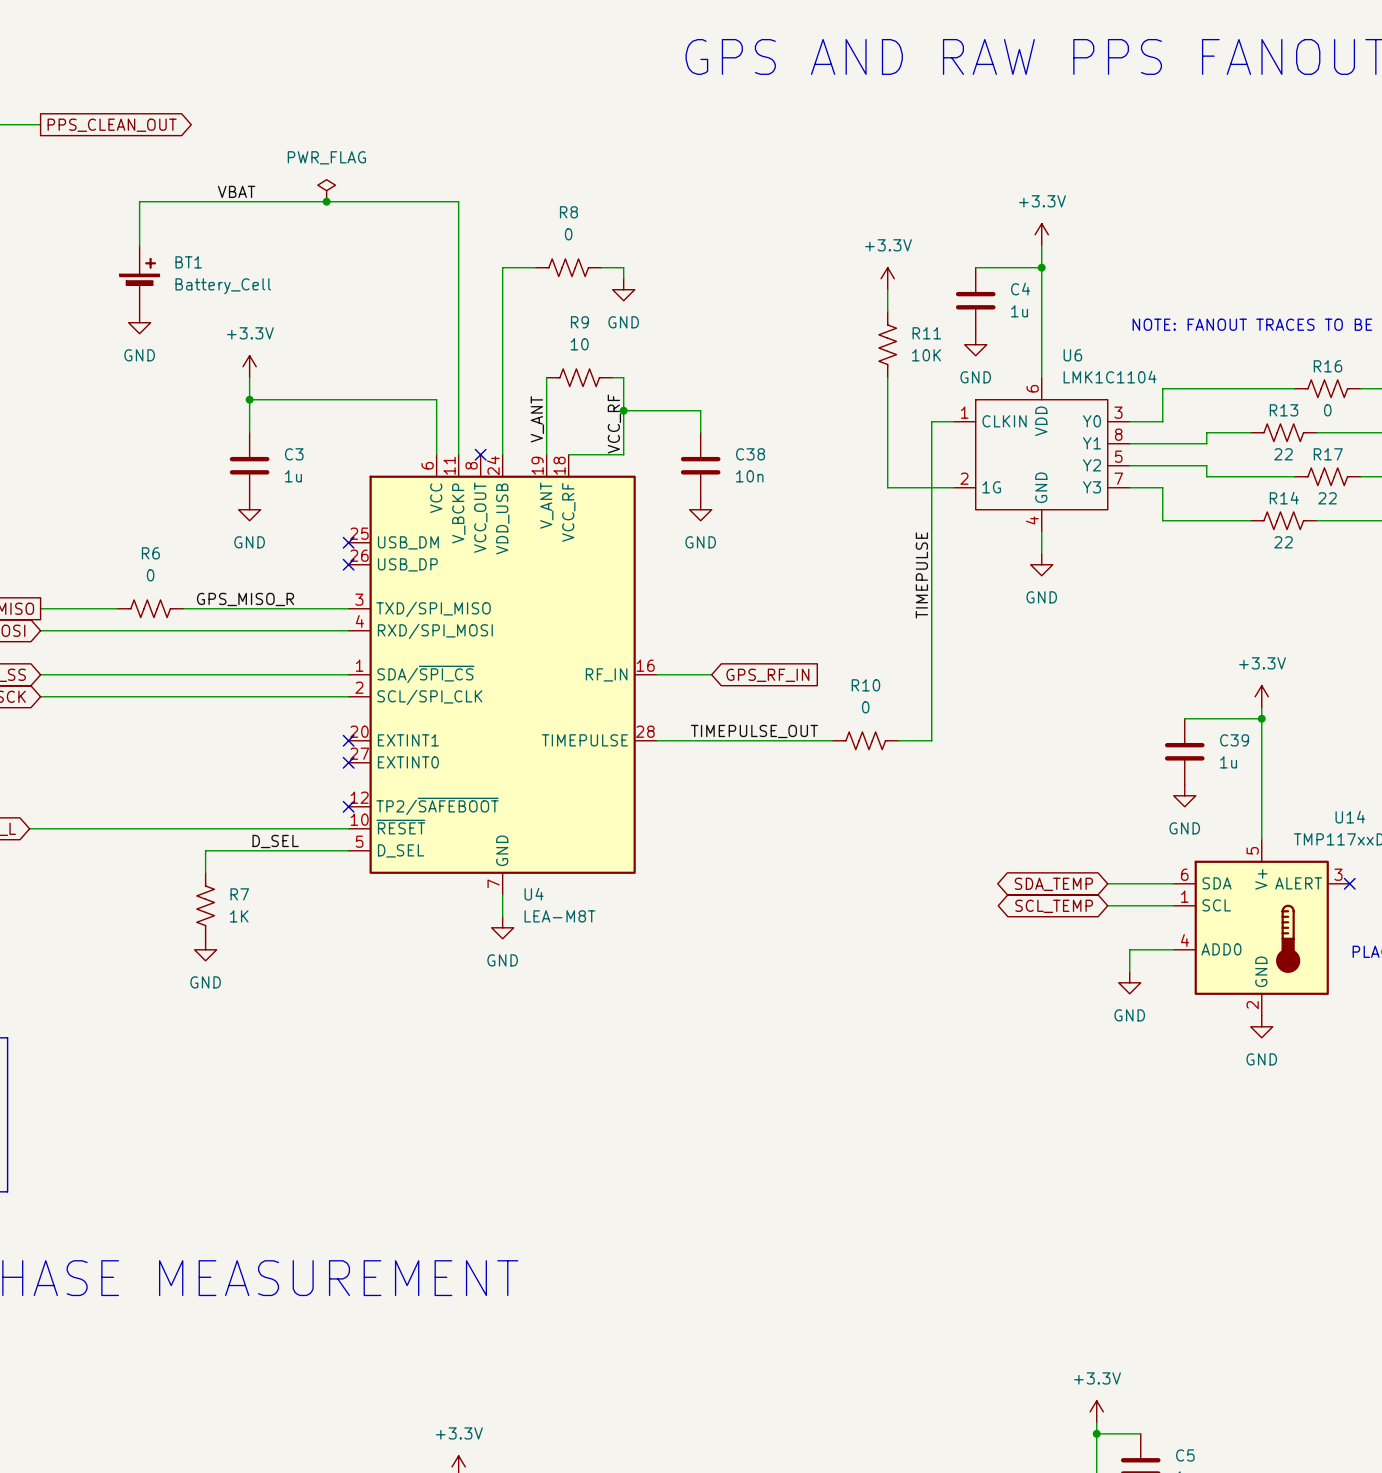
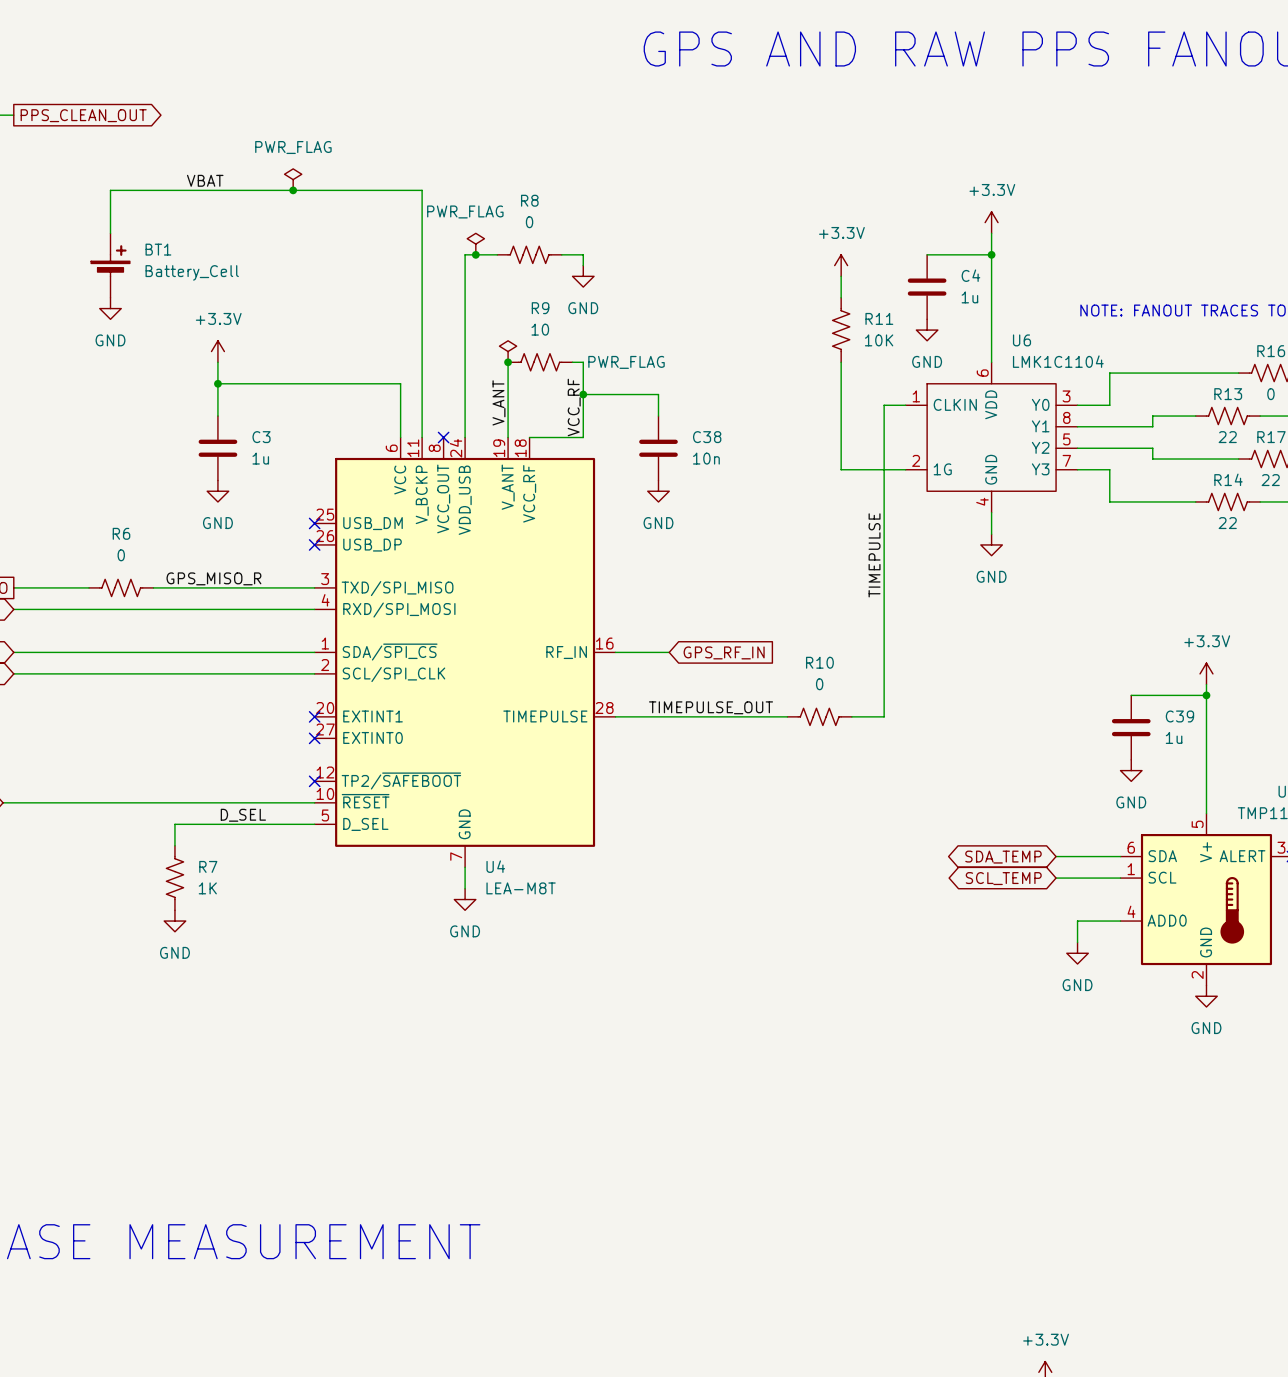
power symbol: none -> PWR_FLAG (475, 244)
junction: none -> (475, 254)
power symbol: none -> PWR_FLAG (508, 351)
junction: none -> (508, 362)

